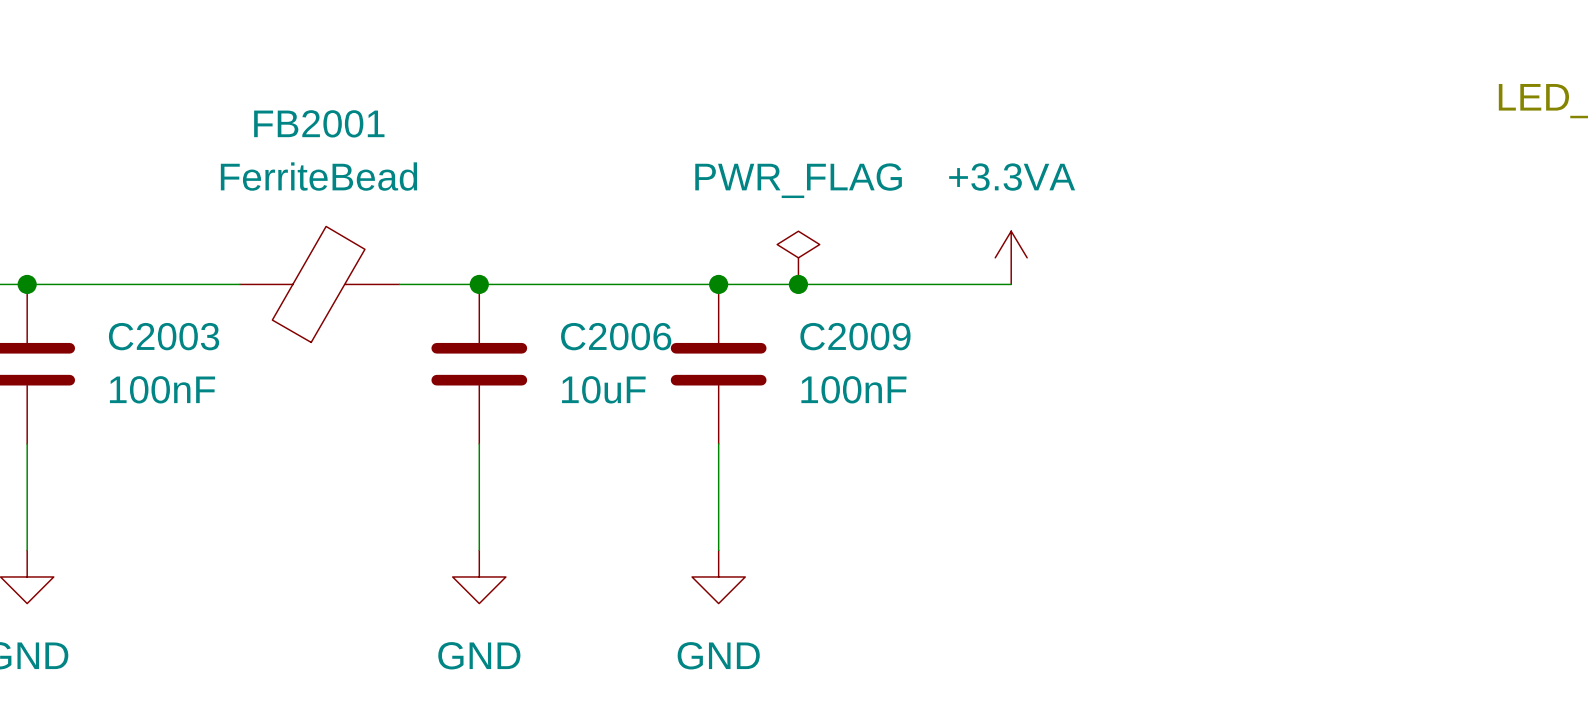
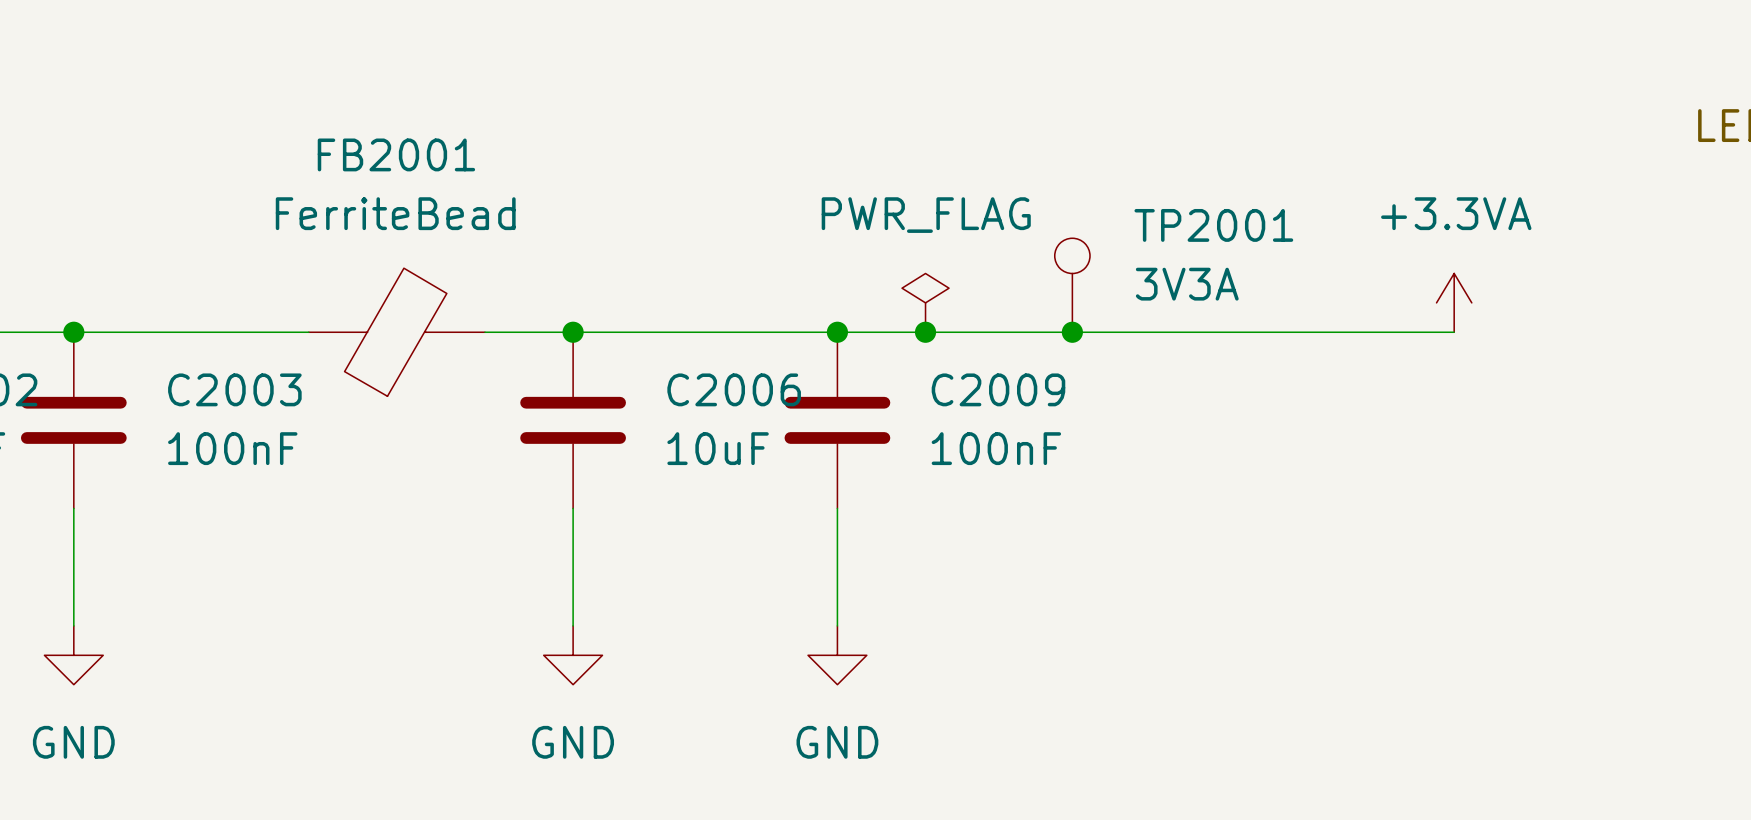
TP2001: none -> 3V3A (1072, 285)
power symbol position: +3.3VA (1011, 257) -> +3.3VA (1454, 302)
junction: none -> (1072, 332)
wire: none -> (1160, 332) (1454, 332)

